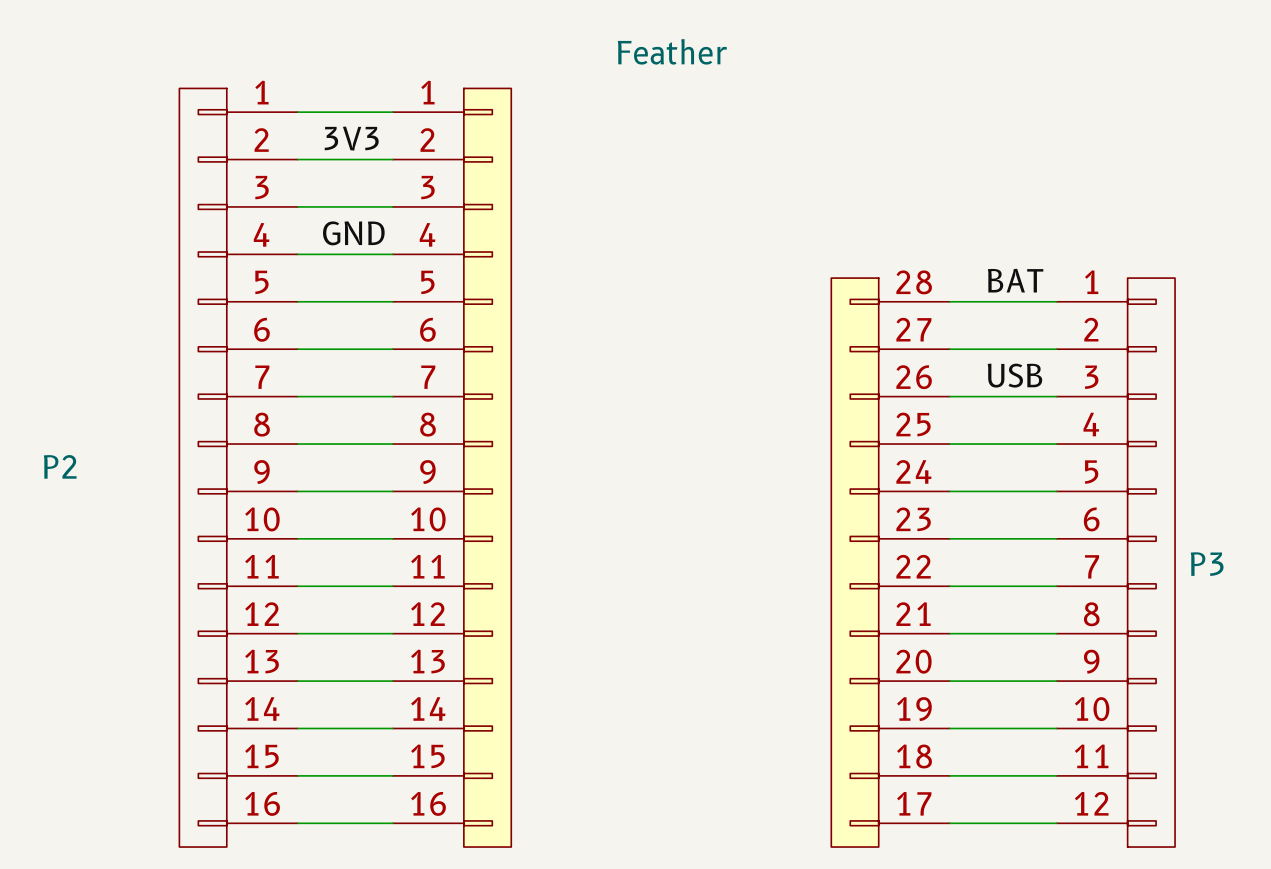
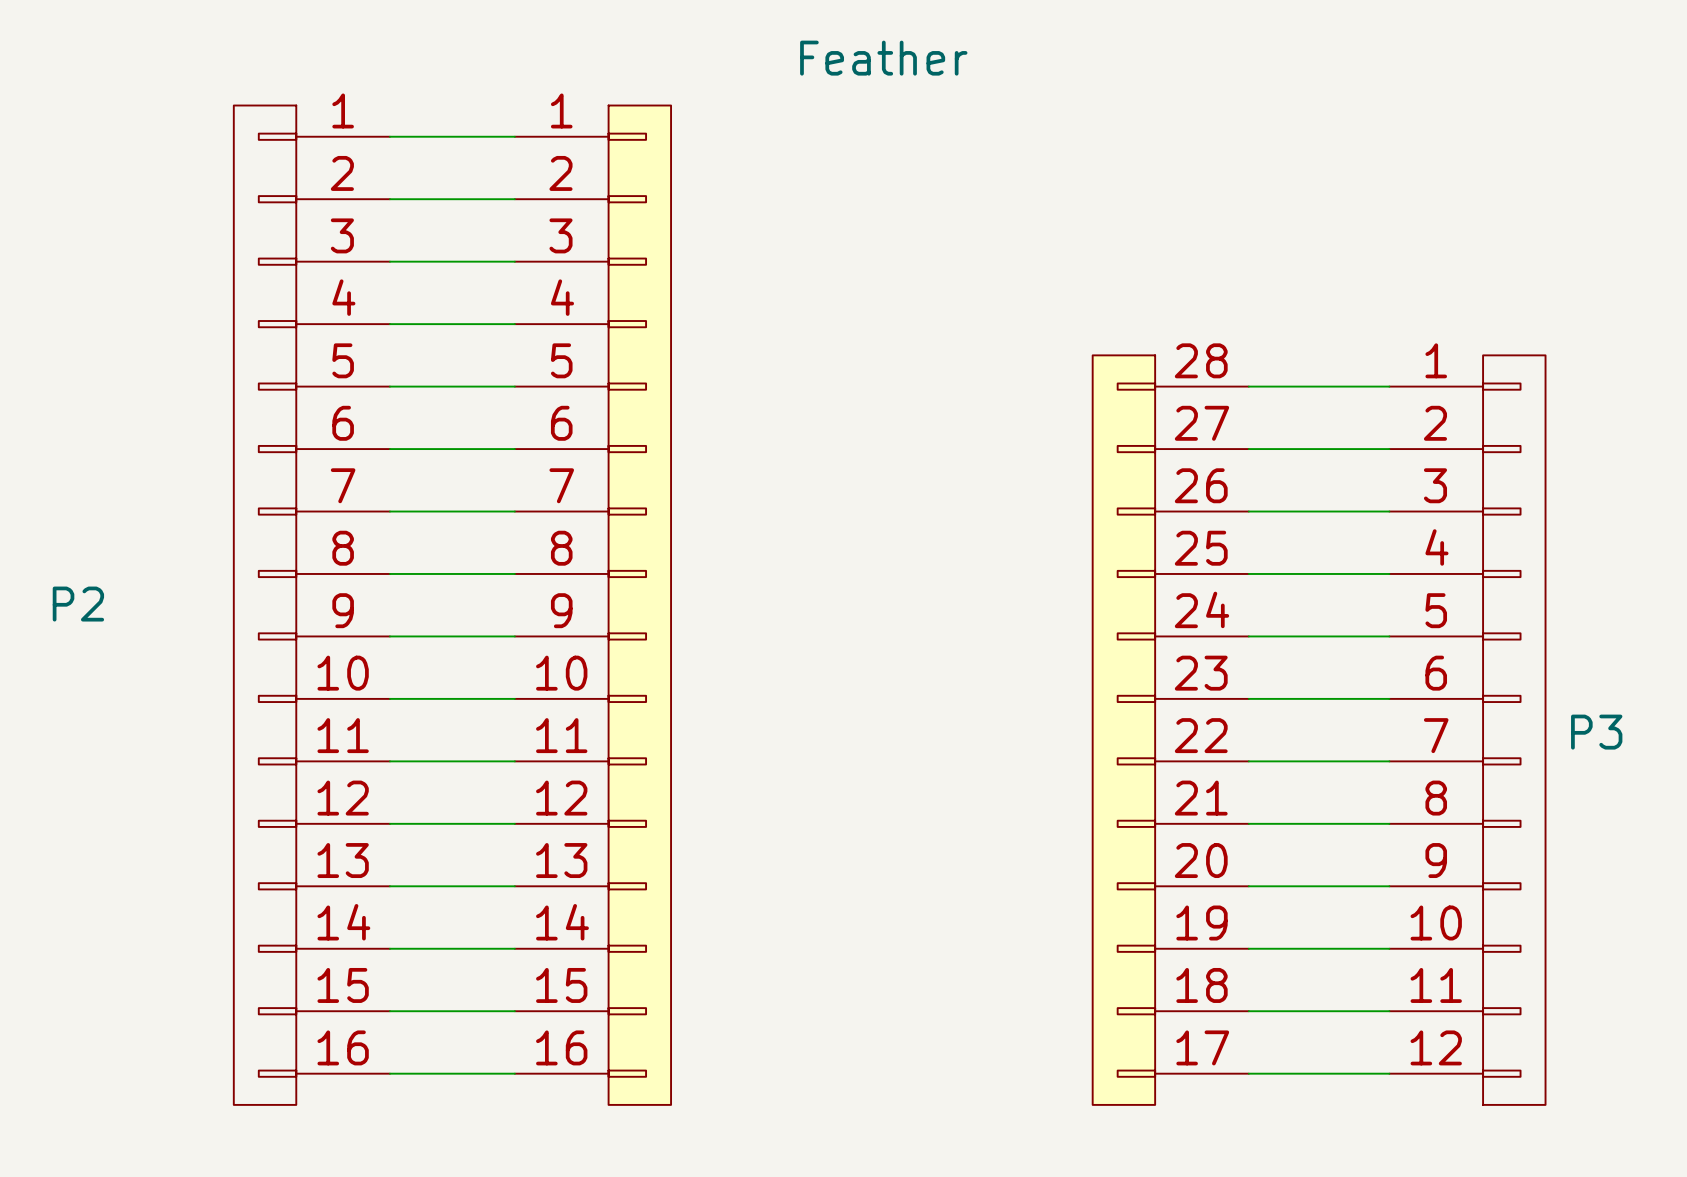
label: 3V3 (351, 138) -> none
label: GND (353, 233) -> none
label: BAT (1015, 280) -> none
label: USB (1014, 375) -> none

